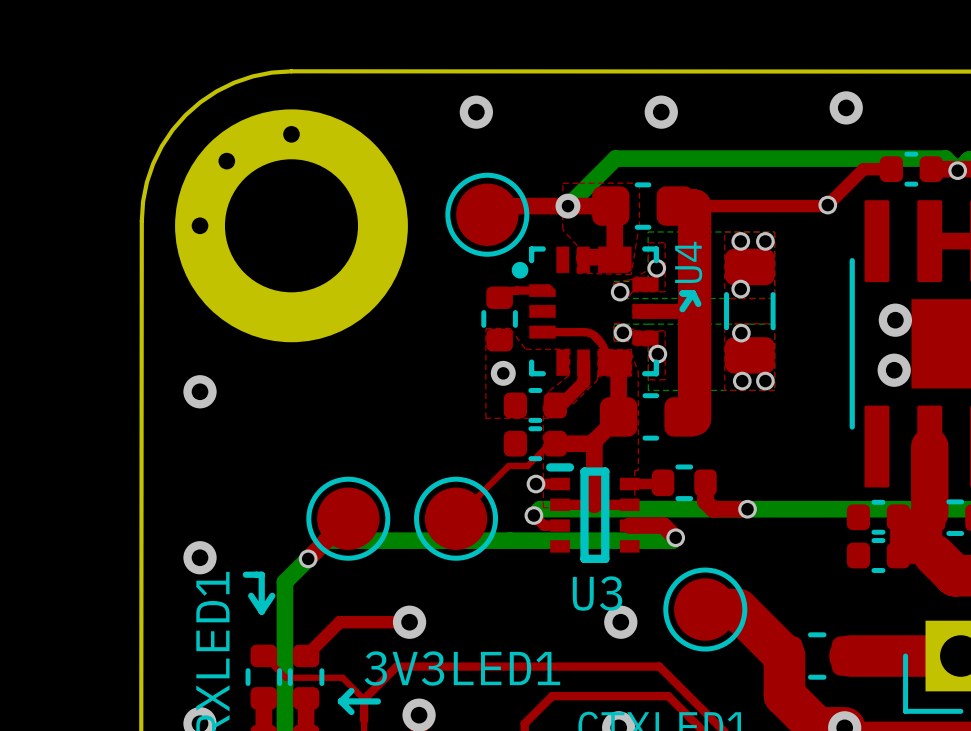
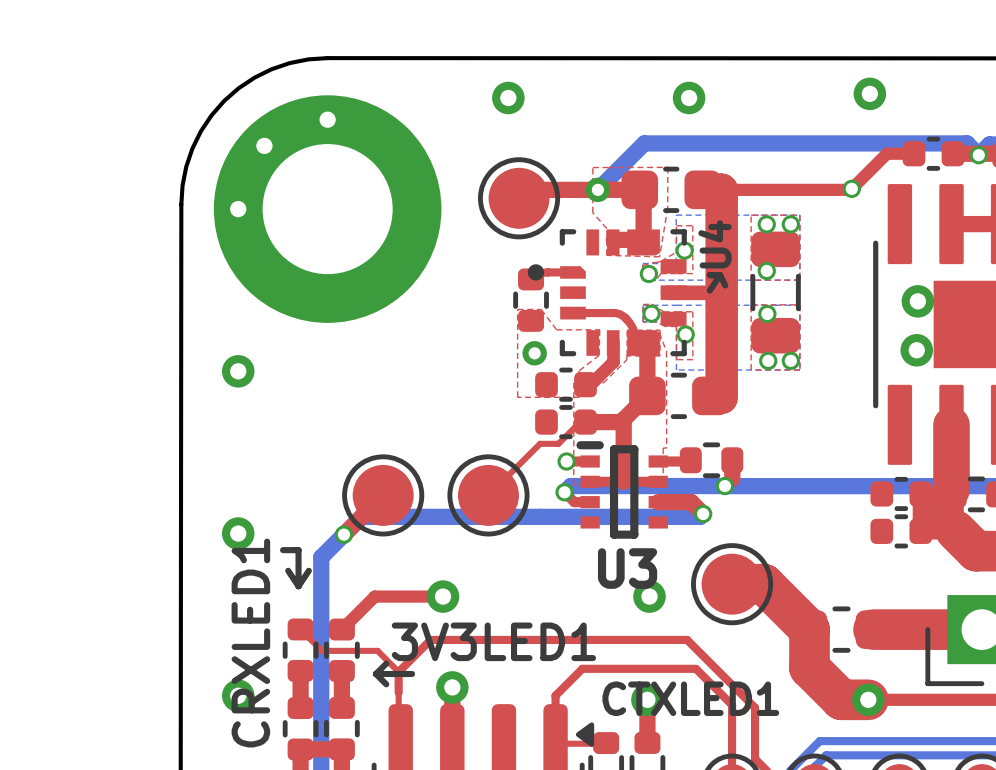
U4 footprint: [511, 246, 659, 377] -> [527, 229, 687, 357]
top track: (705, 501) (713, 509) (747, 509) -> none
via position: (747, 509) -> (724, 486)

